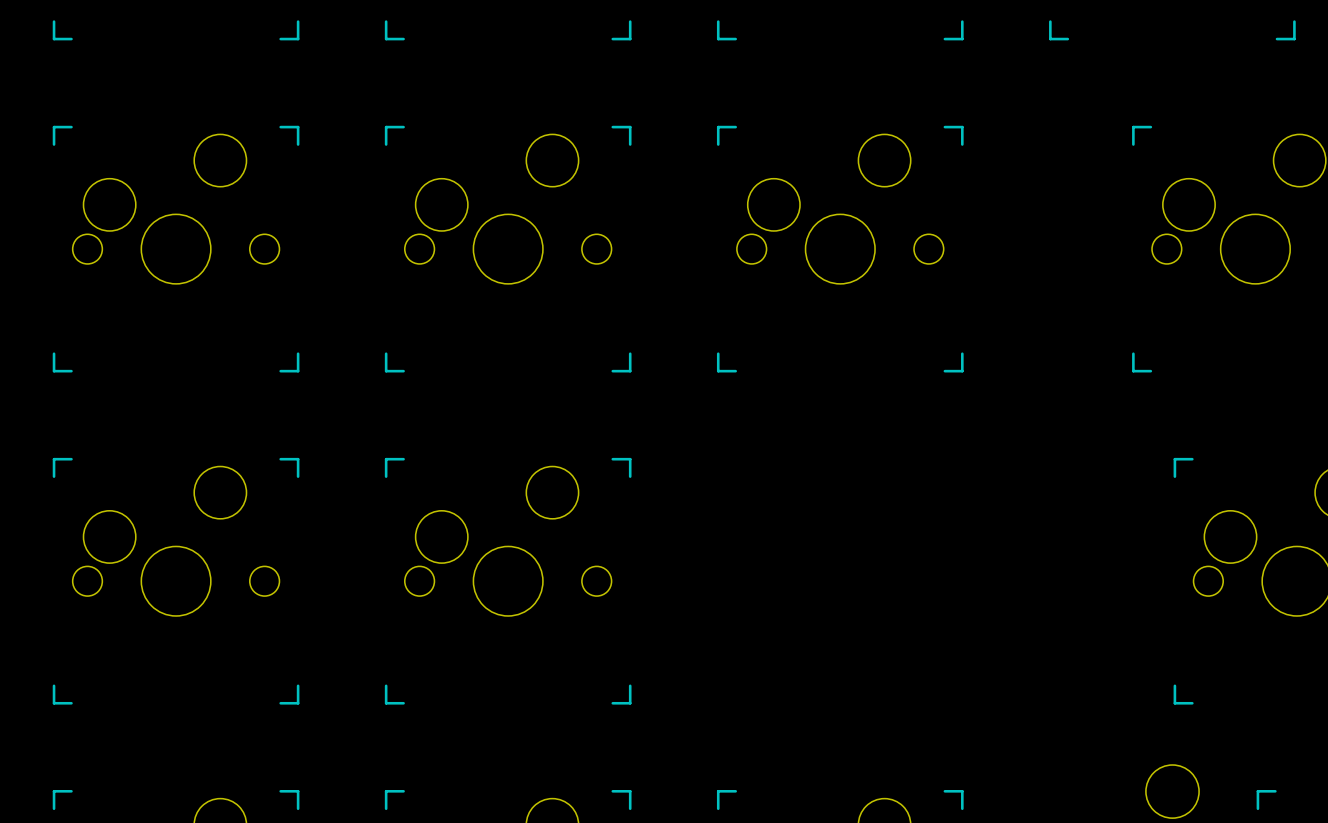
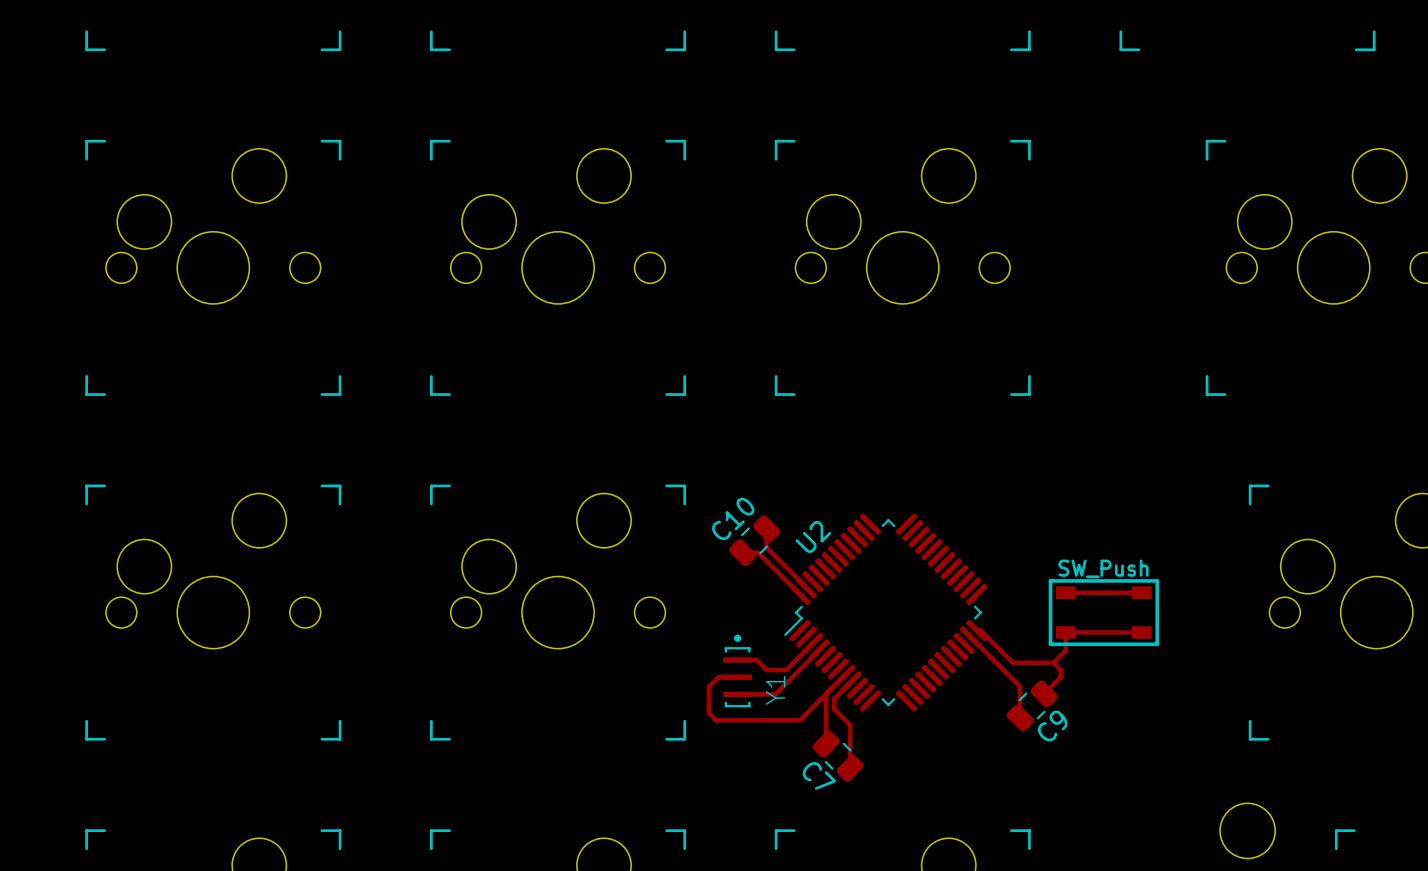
track: none -> (766, 528) (766, 547) (806, 588)
C10: none -> (754, 540)
track: none -> (742, 552) (758, 552) (799, 594)
track: none -> (1065, 592) (1141, 592)
U2: none -> (885, 612)
part: none -> SW_Push (1103, 612)
track: none -> (976, 630) (980, 630) (1012, 662) (1053, 662)
track: none -> (1141, 632) (1065, 632) (1065, 650) (1053, 662)
track: none -> (970, 637) (1020, 686) (1020, 717)
track: none -> (812, 643) (786, 670) (766, 670) (756, 660) (737, 660)
track: none -> (819, 649) (775, 694) (737, 694)
track: none -> (1053, 662) (1060, 670) (1060, 677) (1044, 693)
Y1: none -> (737, 671)
track: none -> (844, 675) (799, 720) (716, 720) (708, 713) (708, 686) (718, 677) (737, 677)
track: none -> (851, 681) (834, 698) (834, 709) (850, 725) (850, 768)
track: none -> (826, 694) (826, 744)
C9: none -> (1032, 705)
C7: none -> (838, 756)

